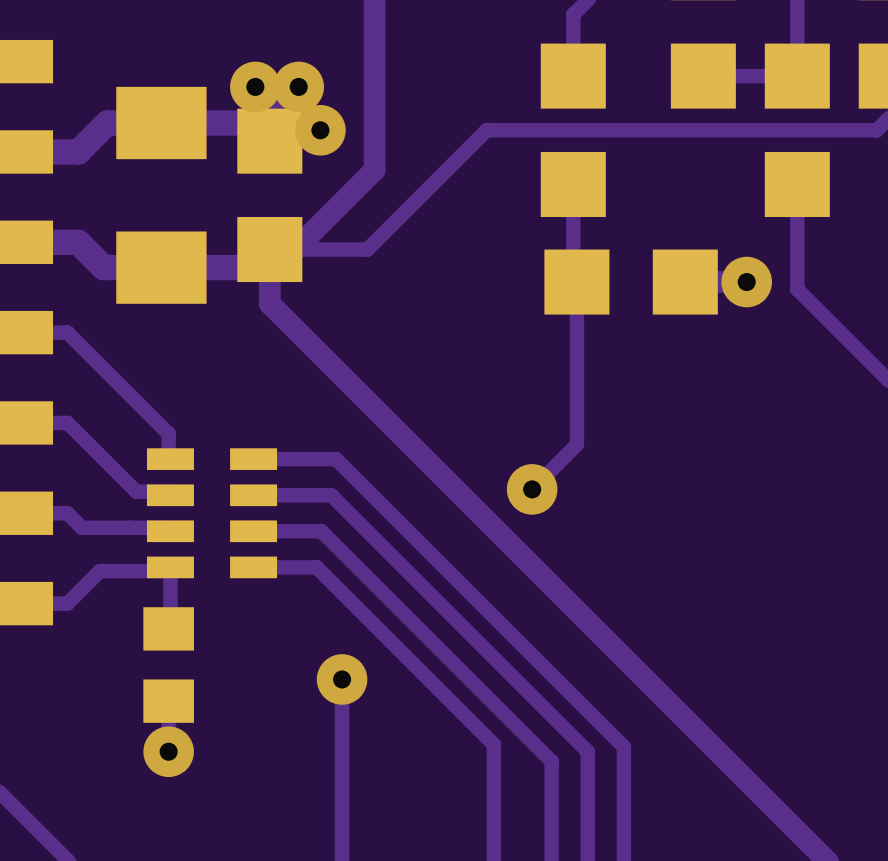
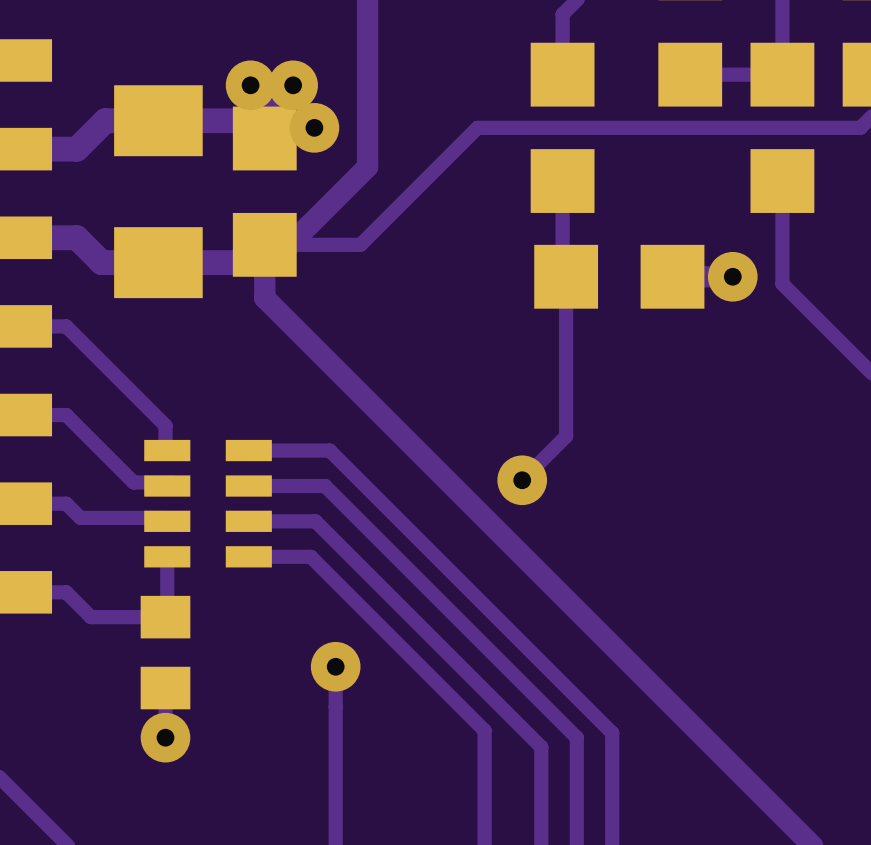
track: (175, 571) (100, 571) (67, 603) -> (165, 617) (91, 617) (66, 592)

